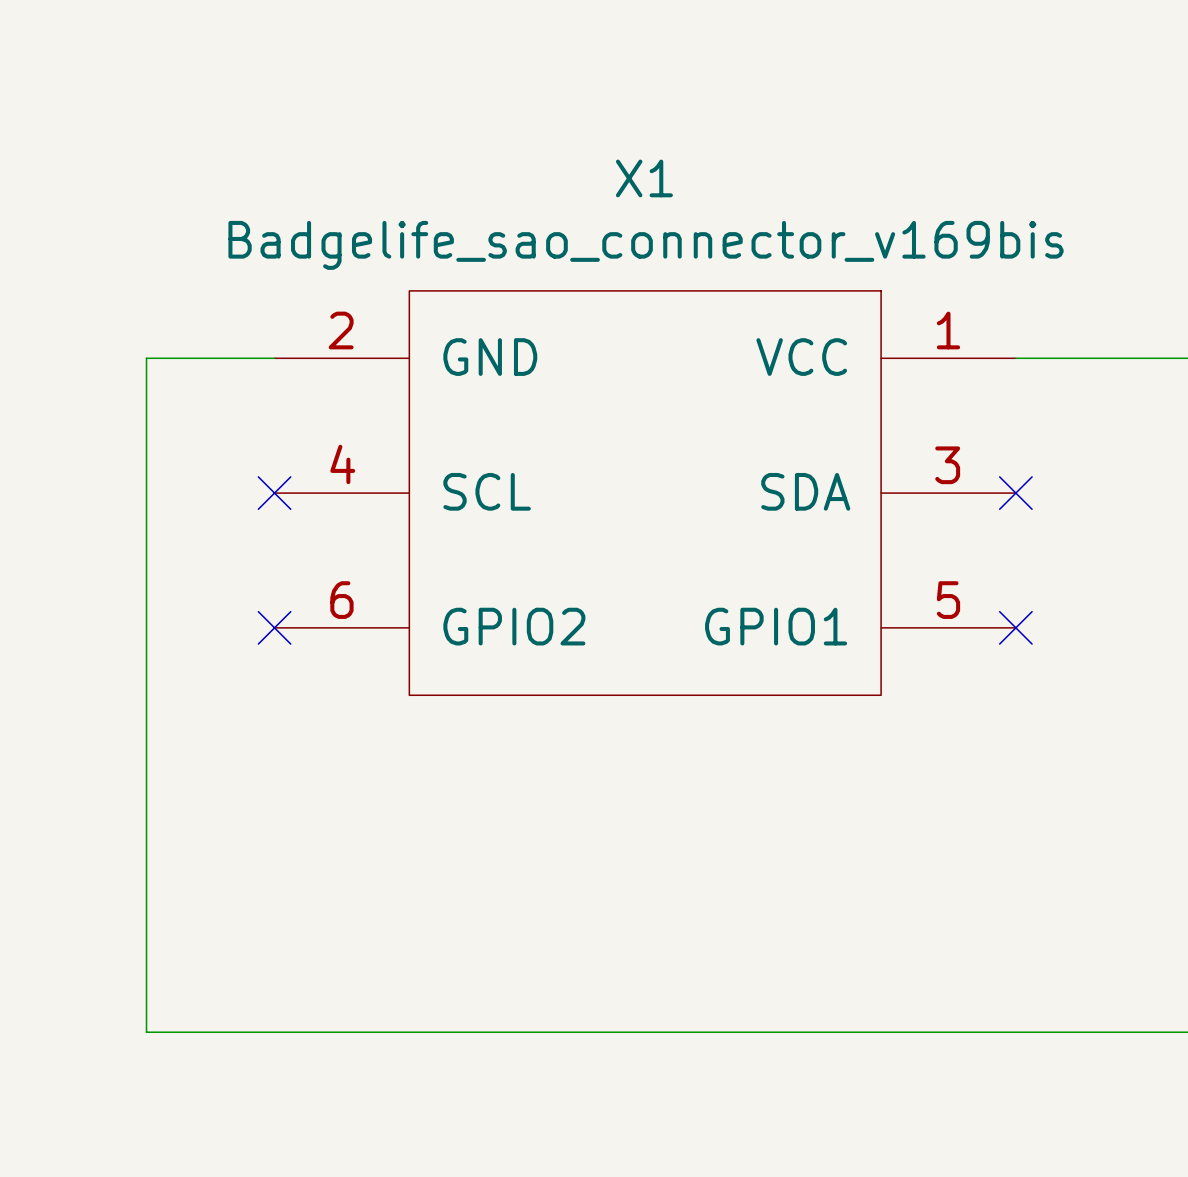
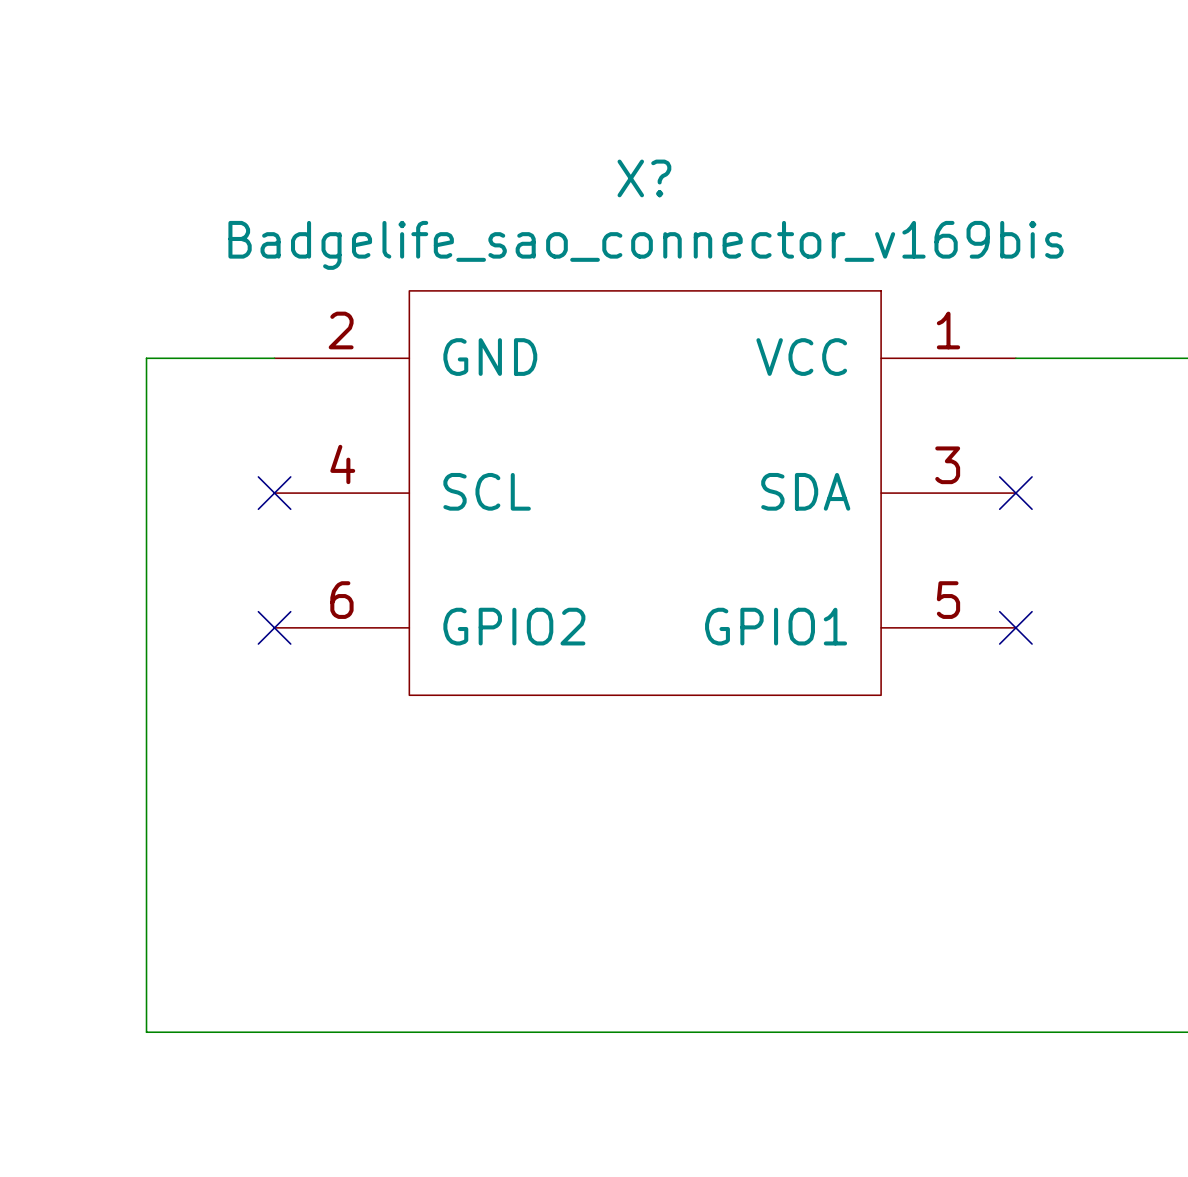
X1 name: X1 (644, 178) -> X? (644, 178)

